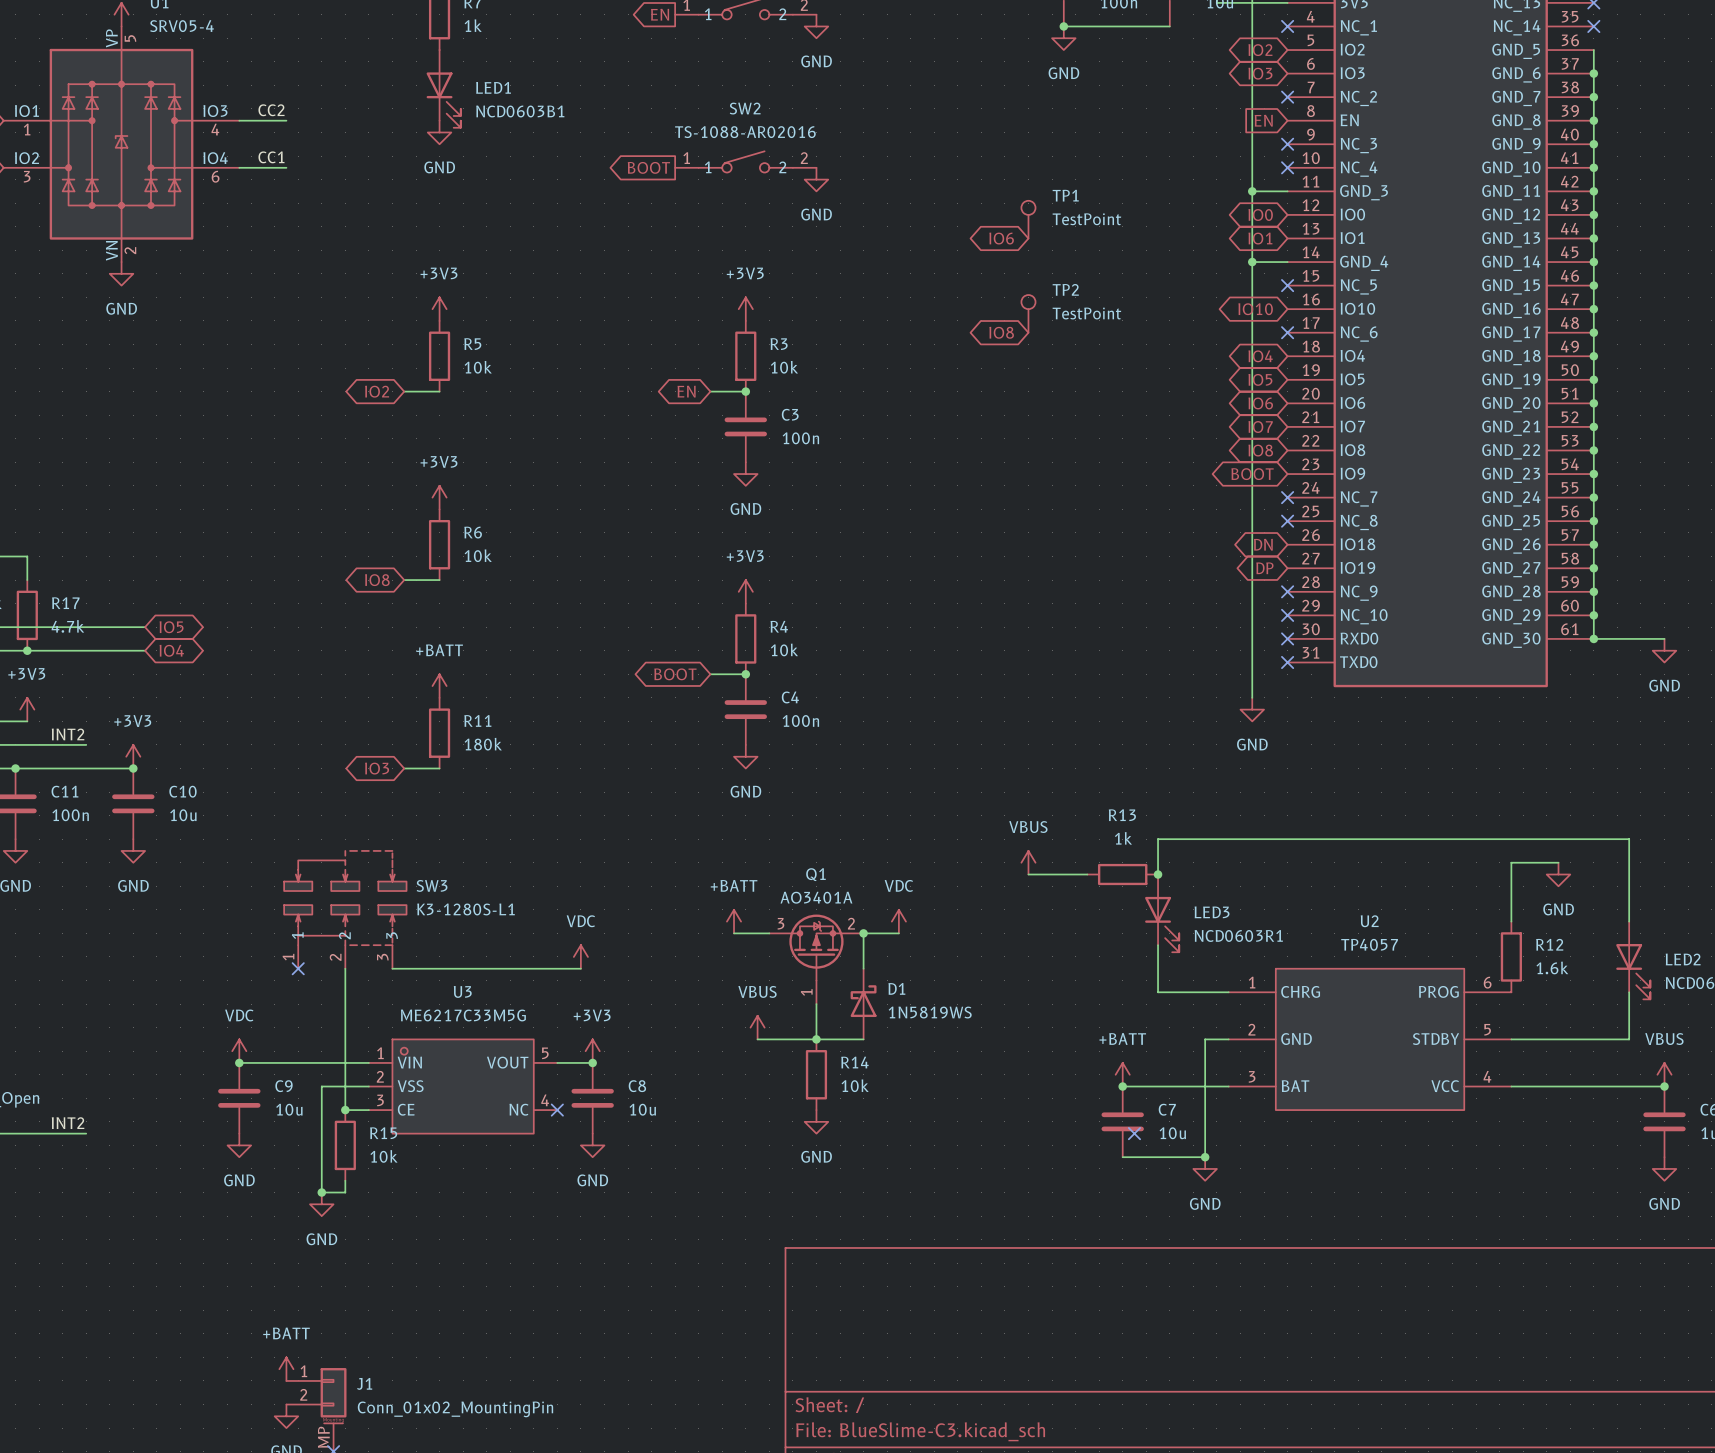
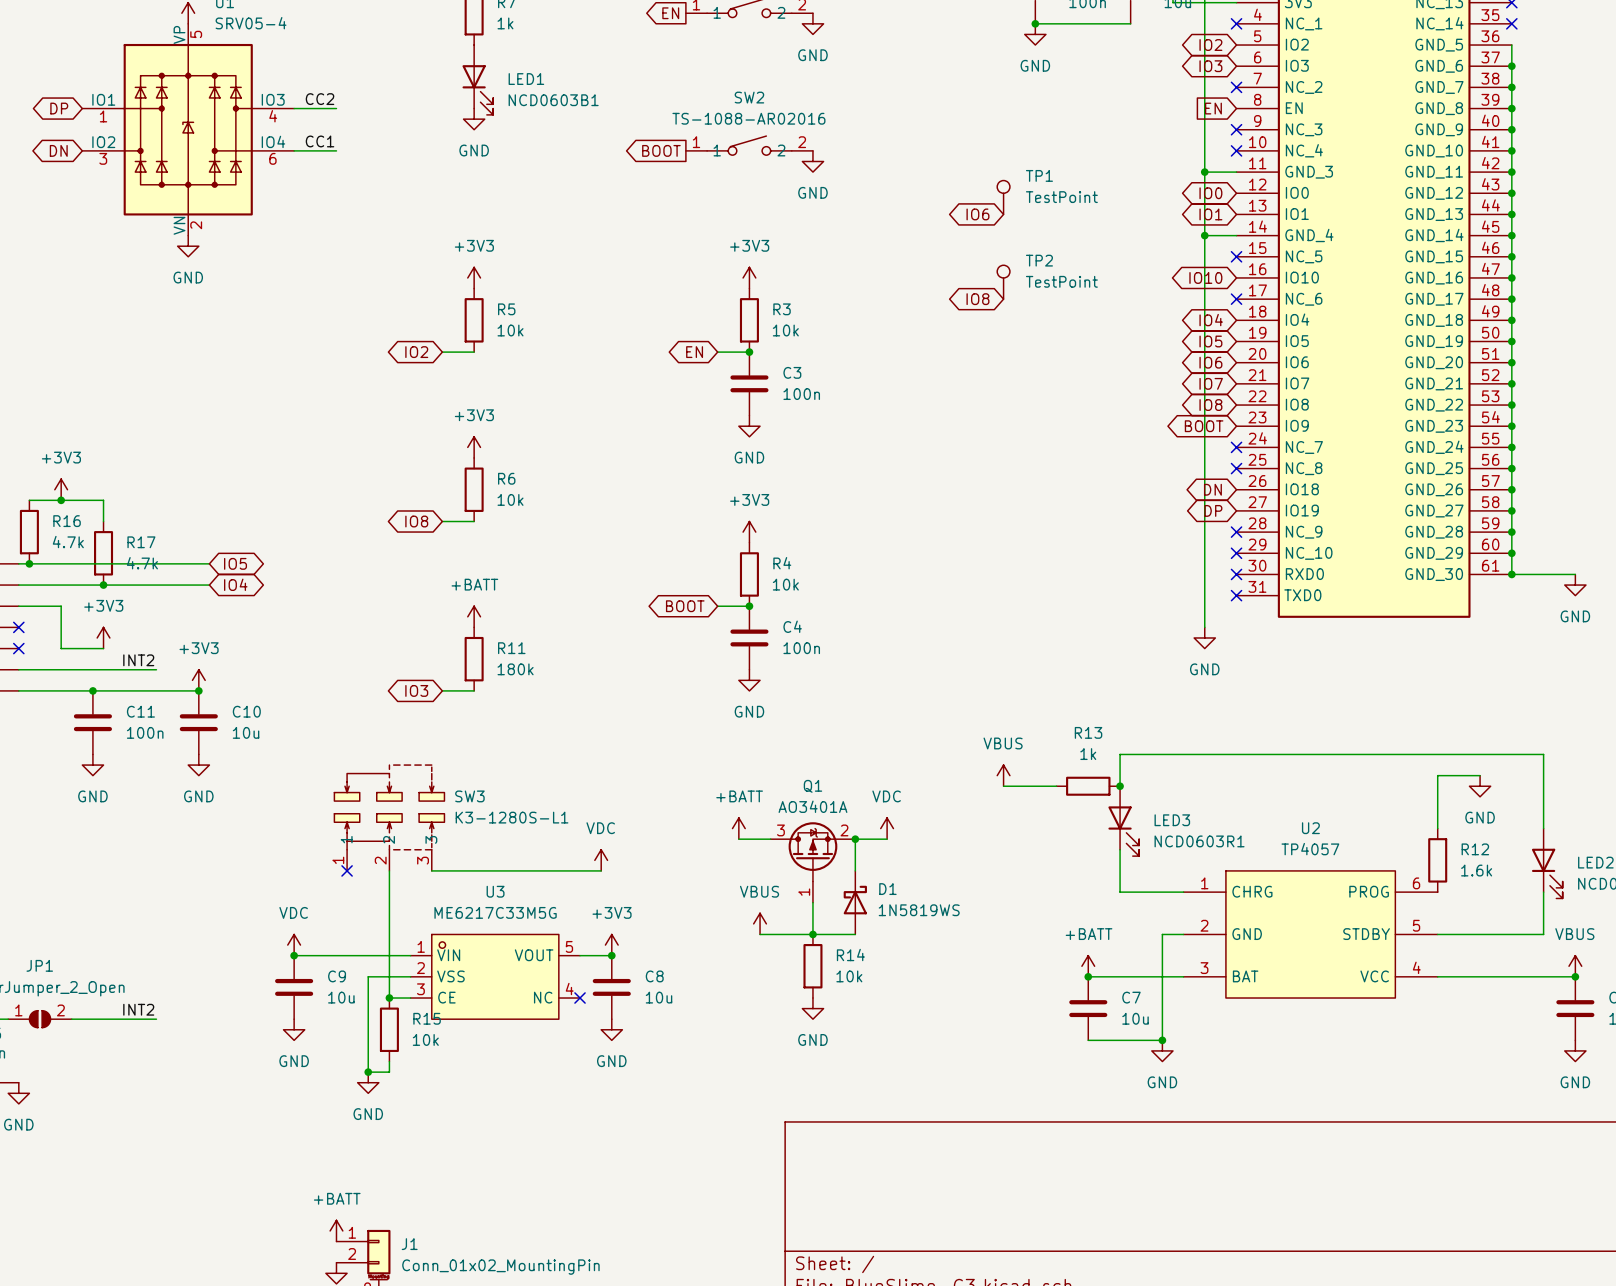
no-connect mark: (1134, 1133) -> none

